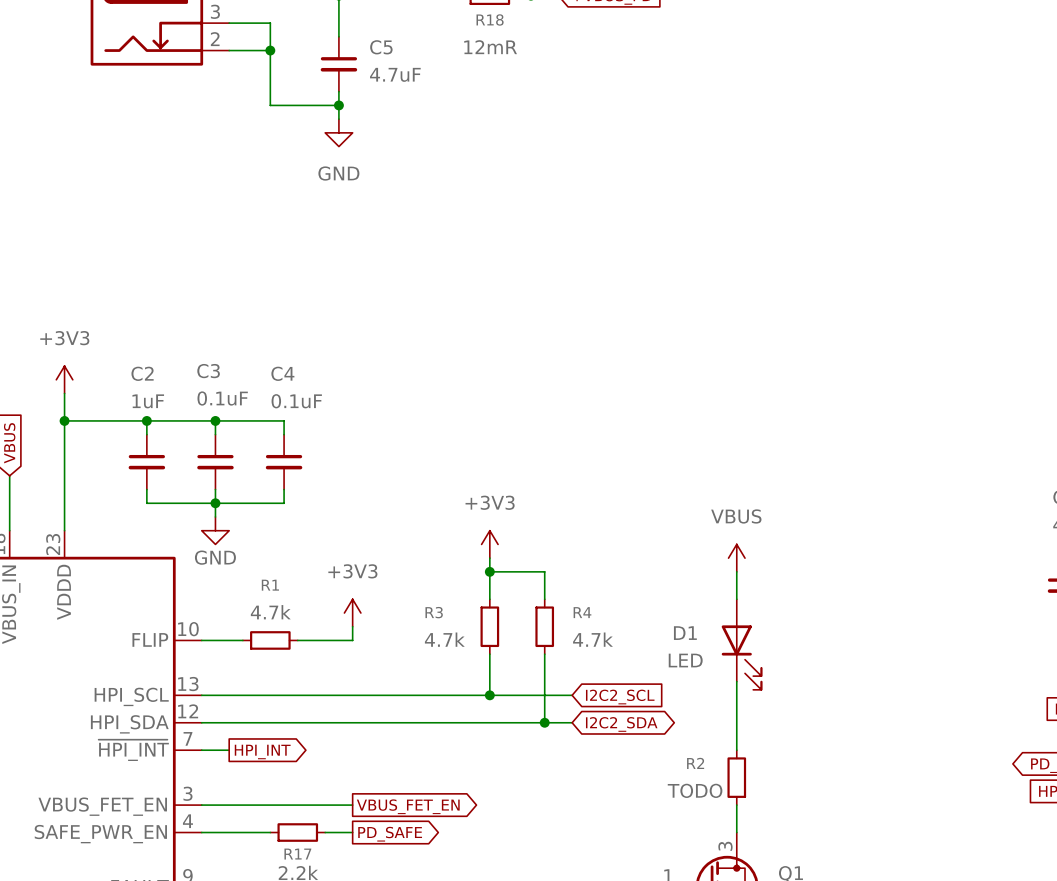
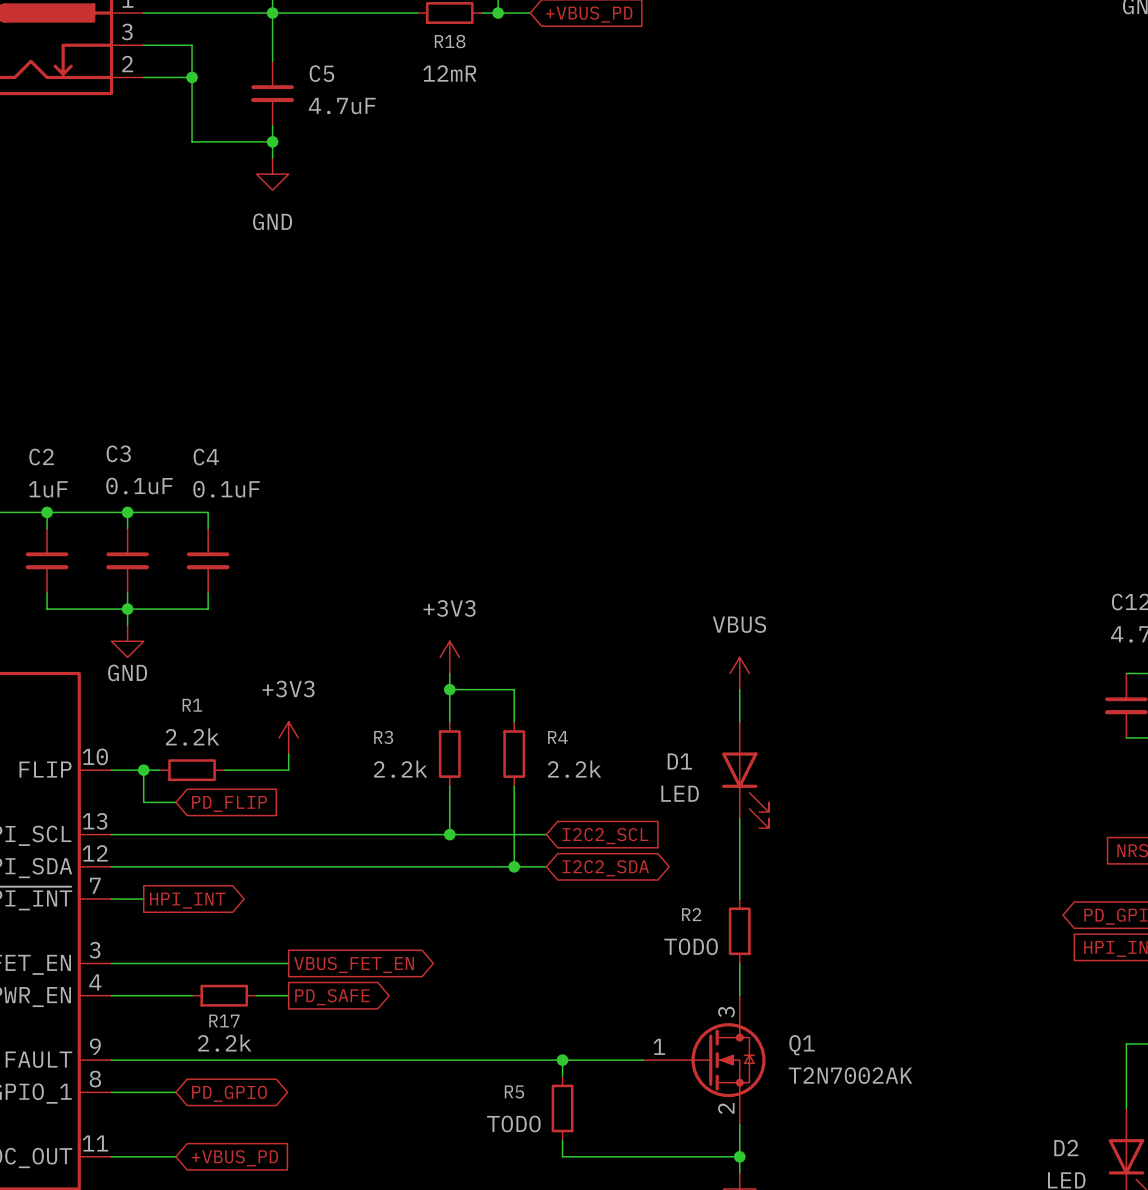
R1 value: 4.7k (270, 612) -> 2.2k (192, 736)
R3 value: 4.7k (444, 639) -> 2.2k (400, 769)
R4 value: 4.7k (592, 639) -> 2.2k (574, 769)
wire: none -> (143, 770) (143, 802) (175, 802)
junction: none -> (143, 770)
global label: none -> PD_FLIP (229, 803)

